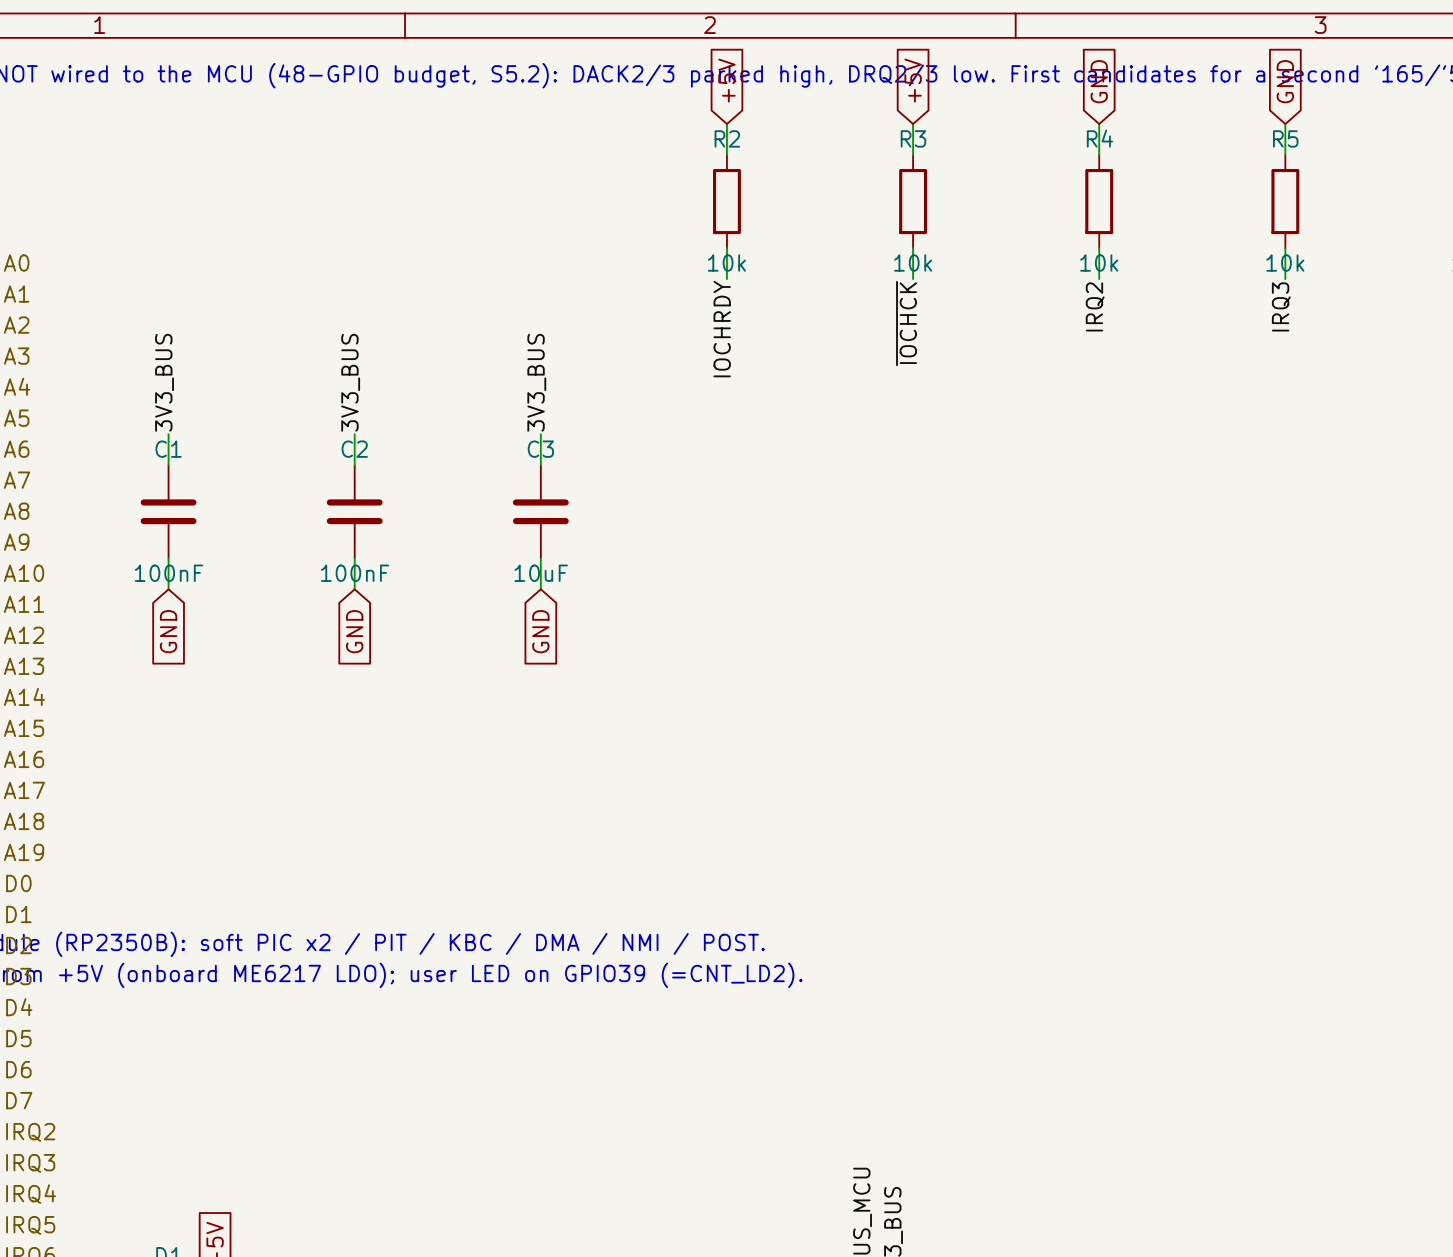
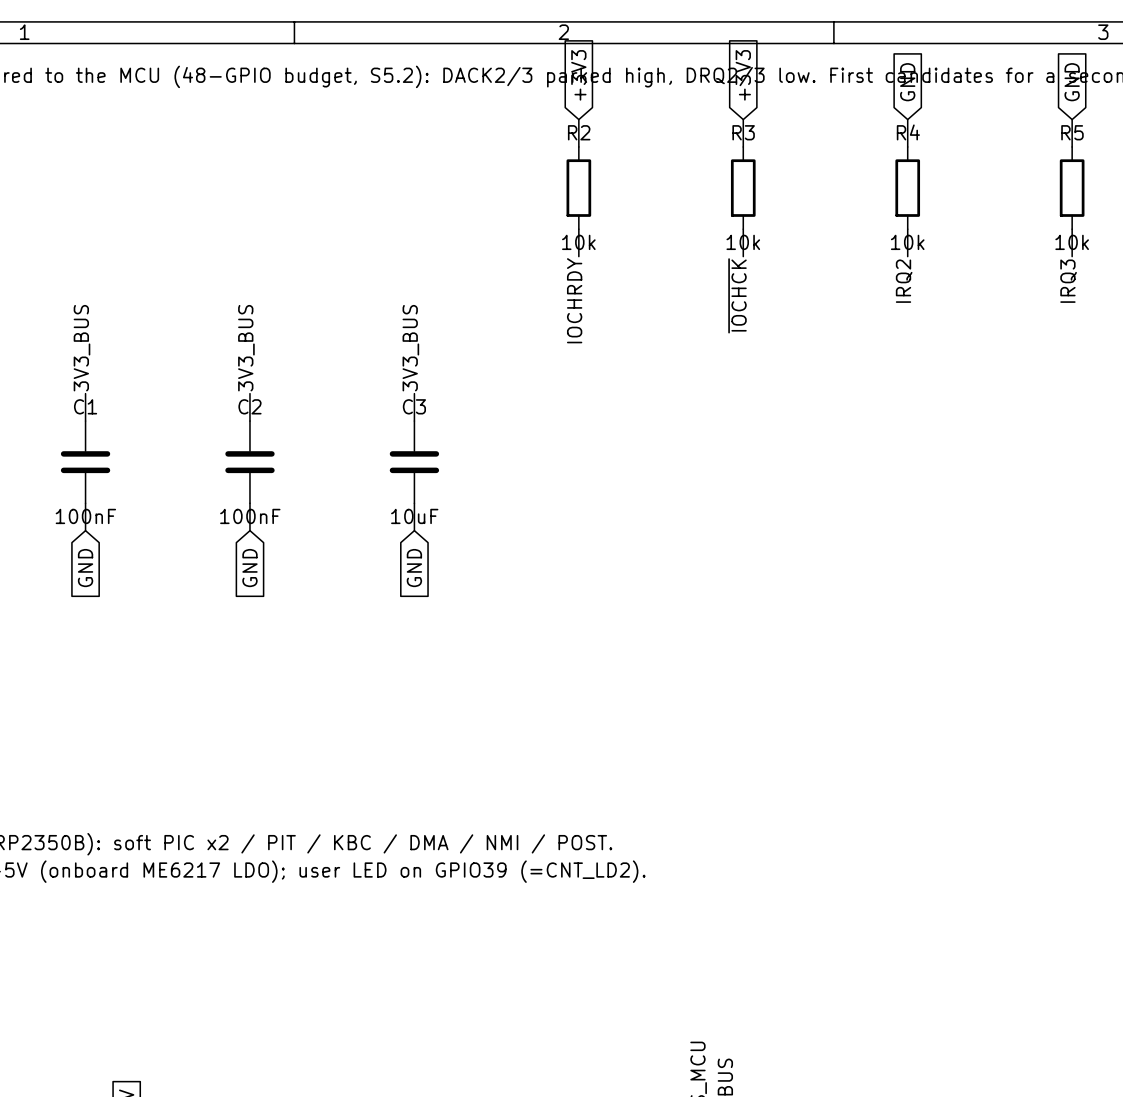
global label: +5V (726, 80) -> +3V3 (578, 75)
global label: +5V (913, 80) -> +3V3 (743, 75)

